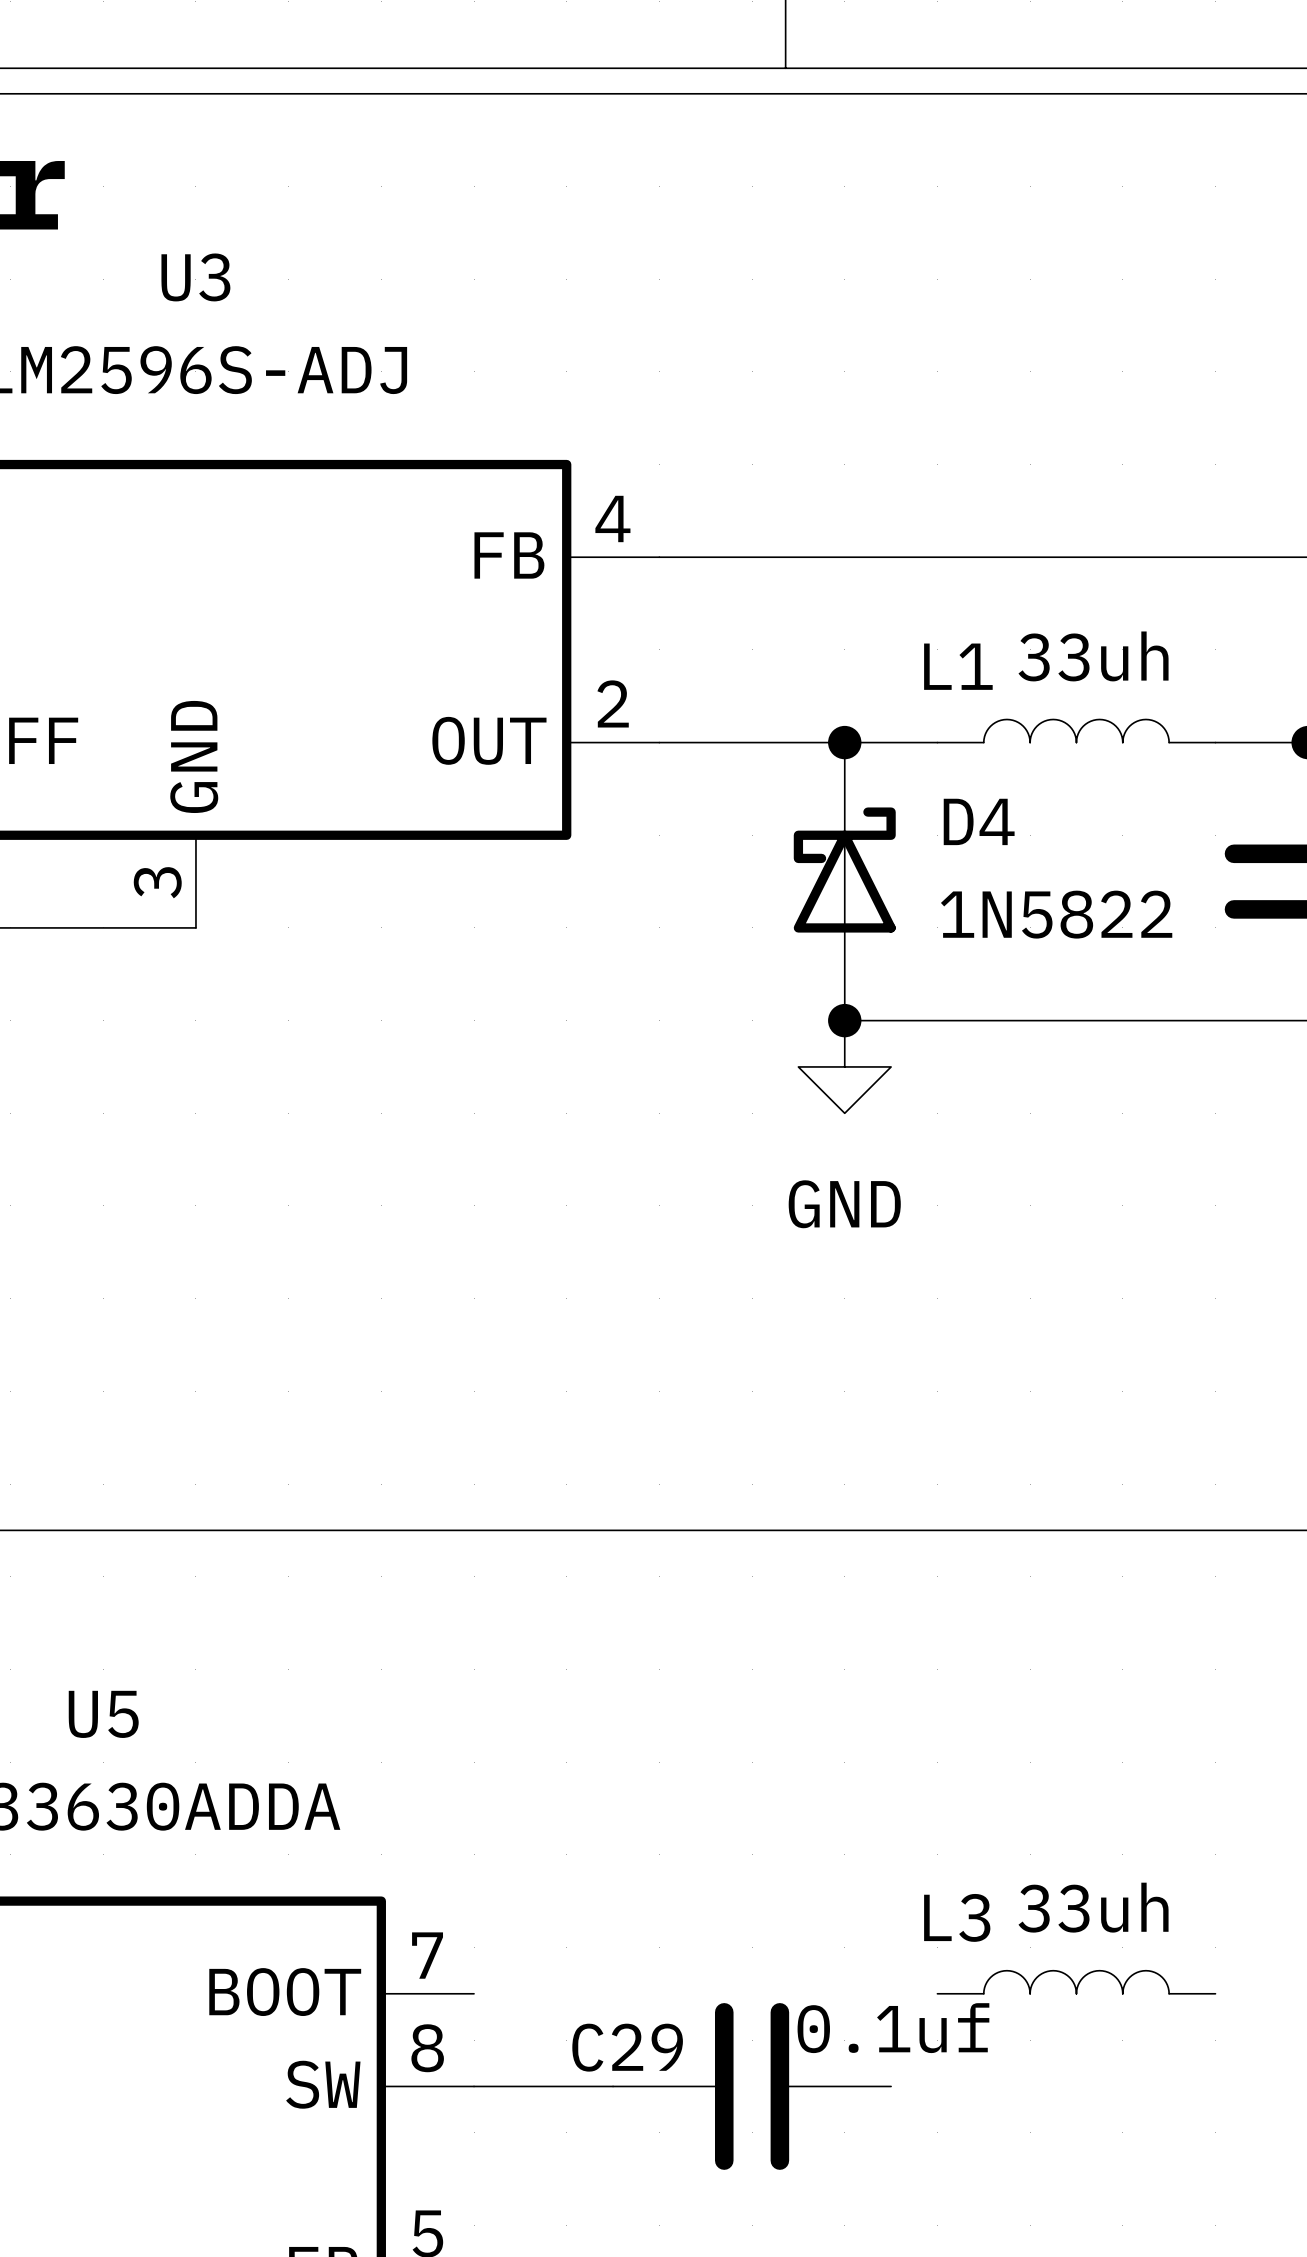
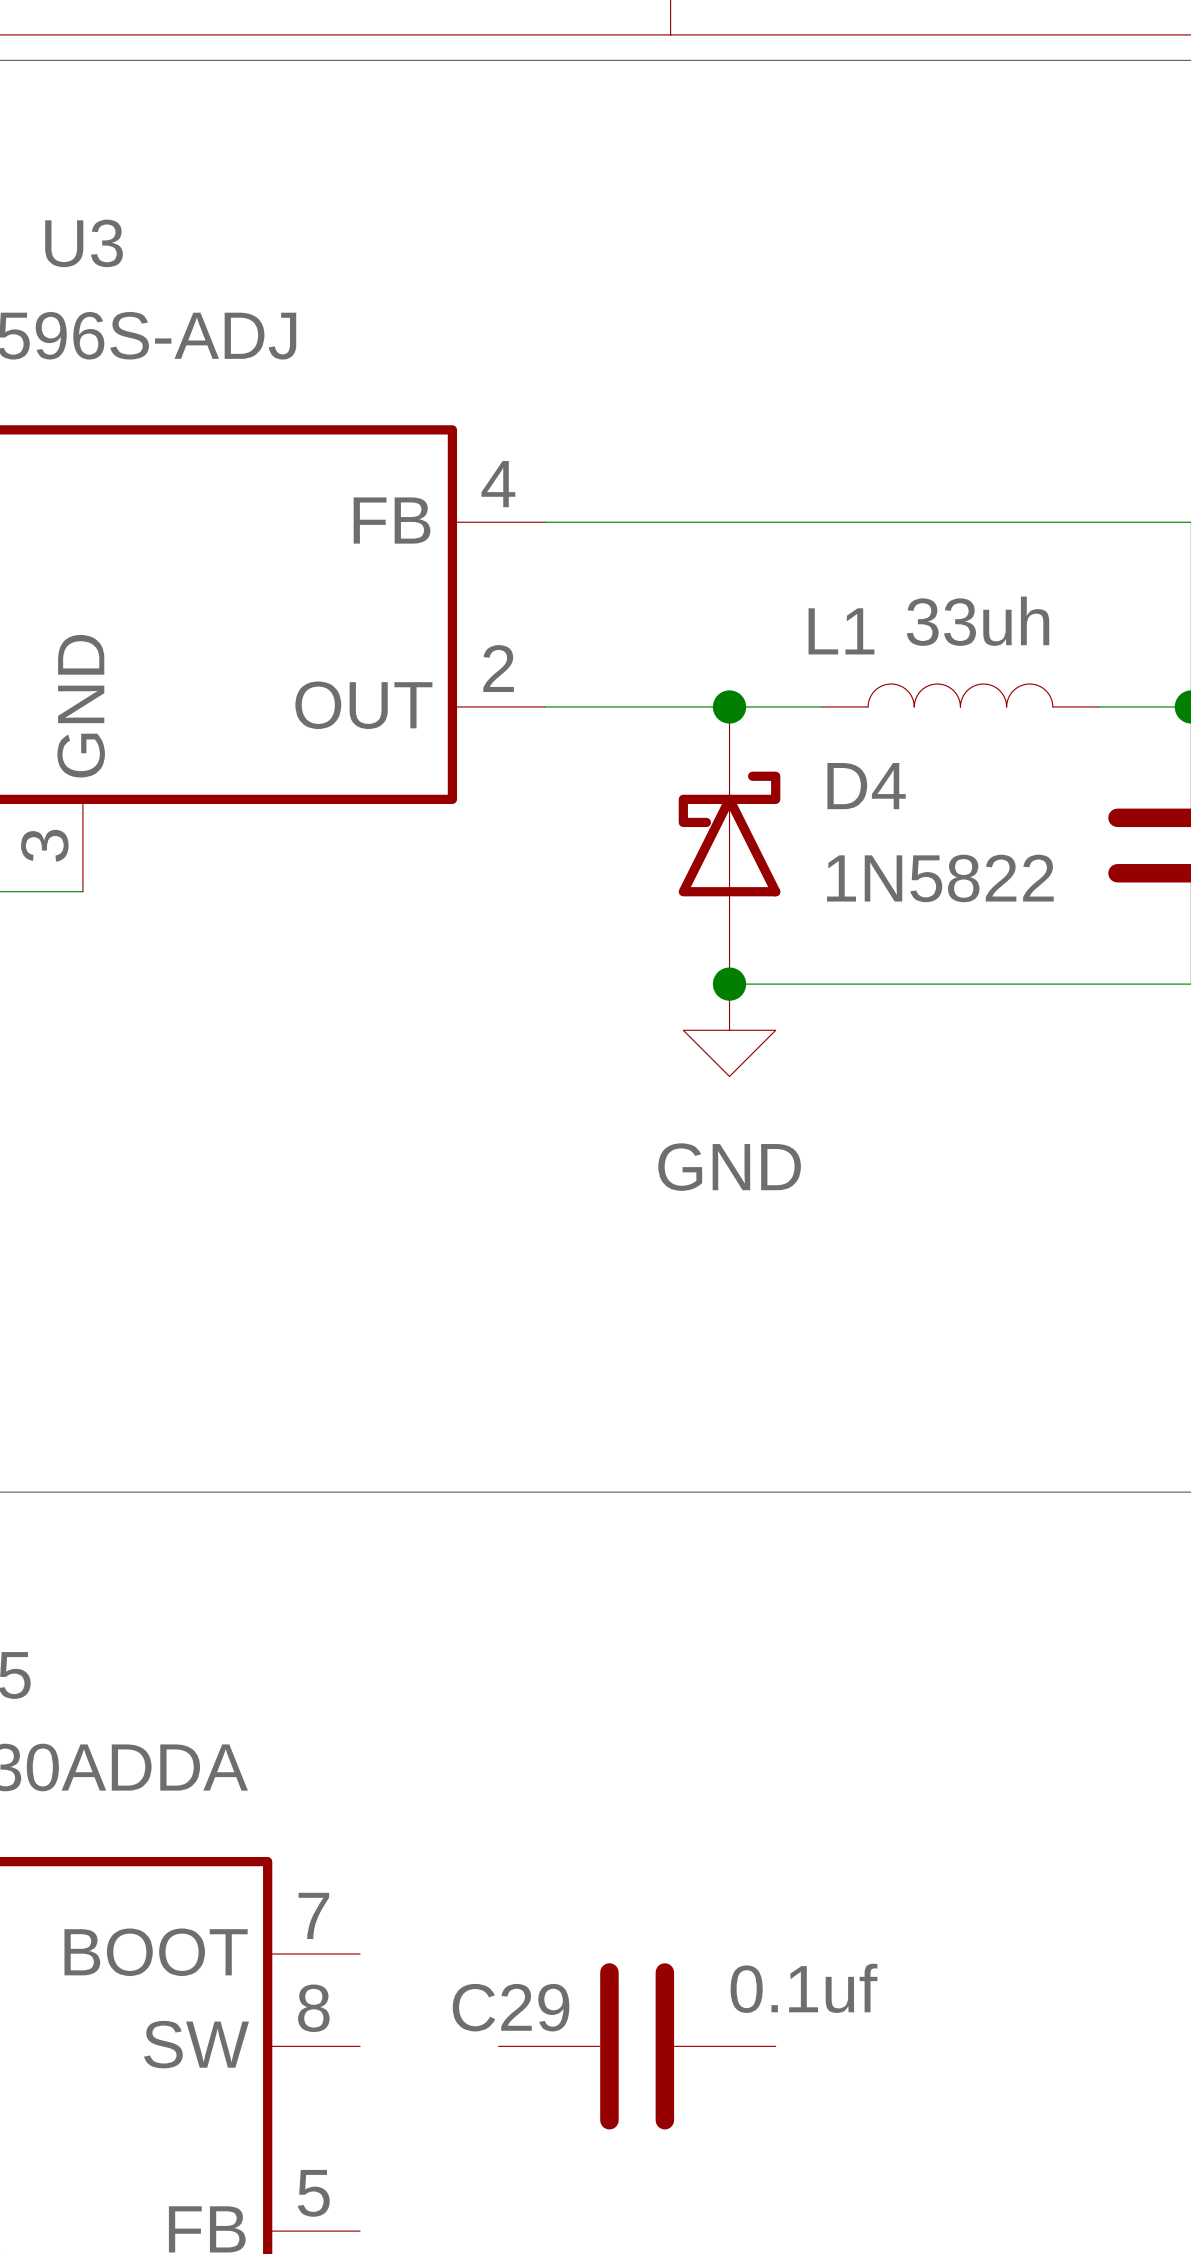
L3: 33uh (1076, 1982) -> none
wire: (474, 2086) (613, 2086) -> none

